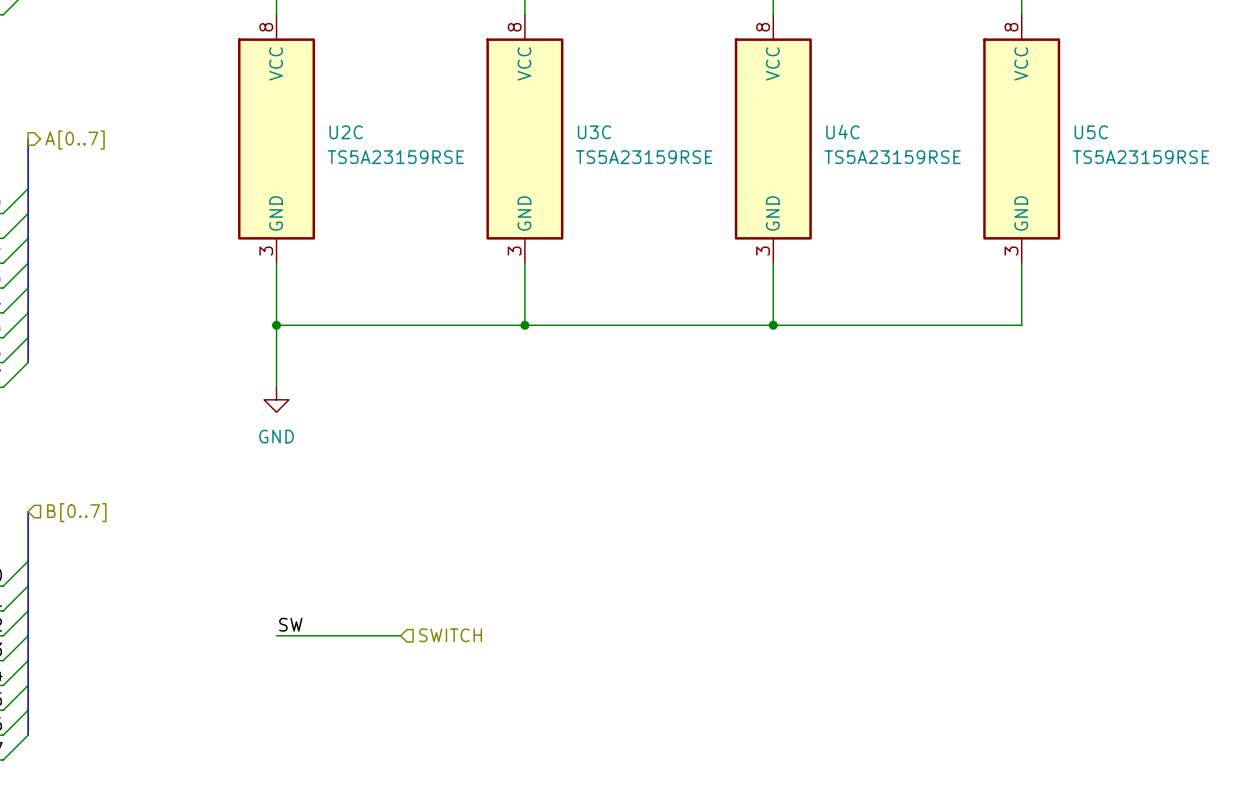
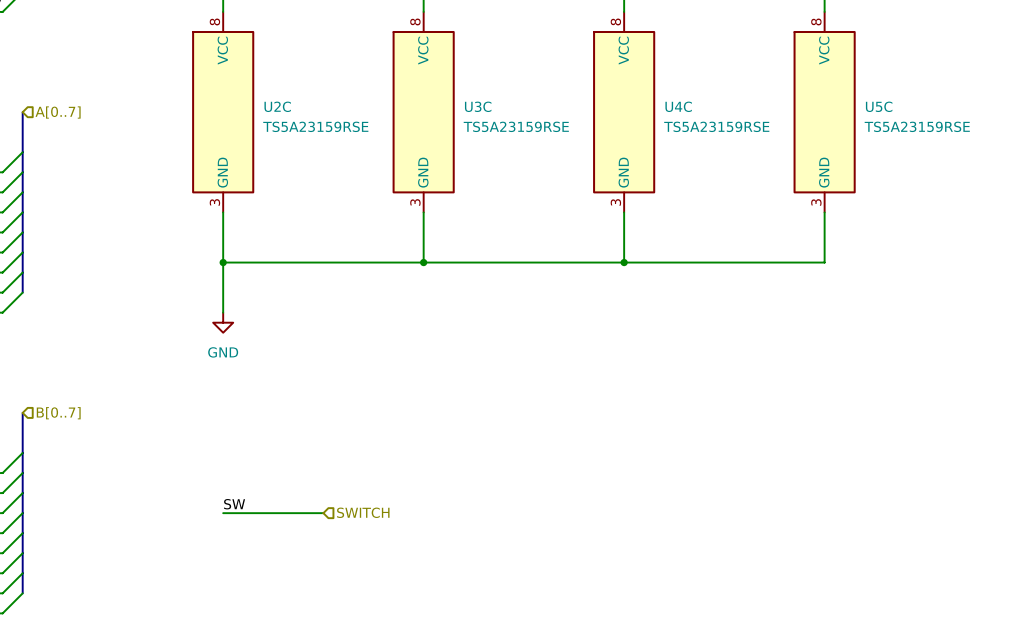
hierarchical label shape: output (75, 140) -> input (58, 112)

